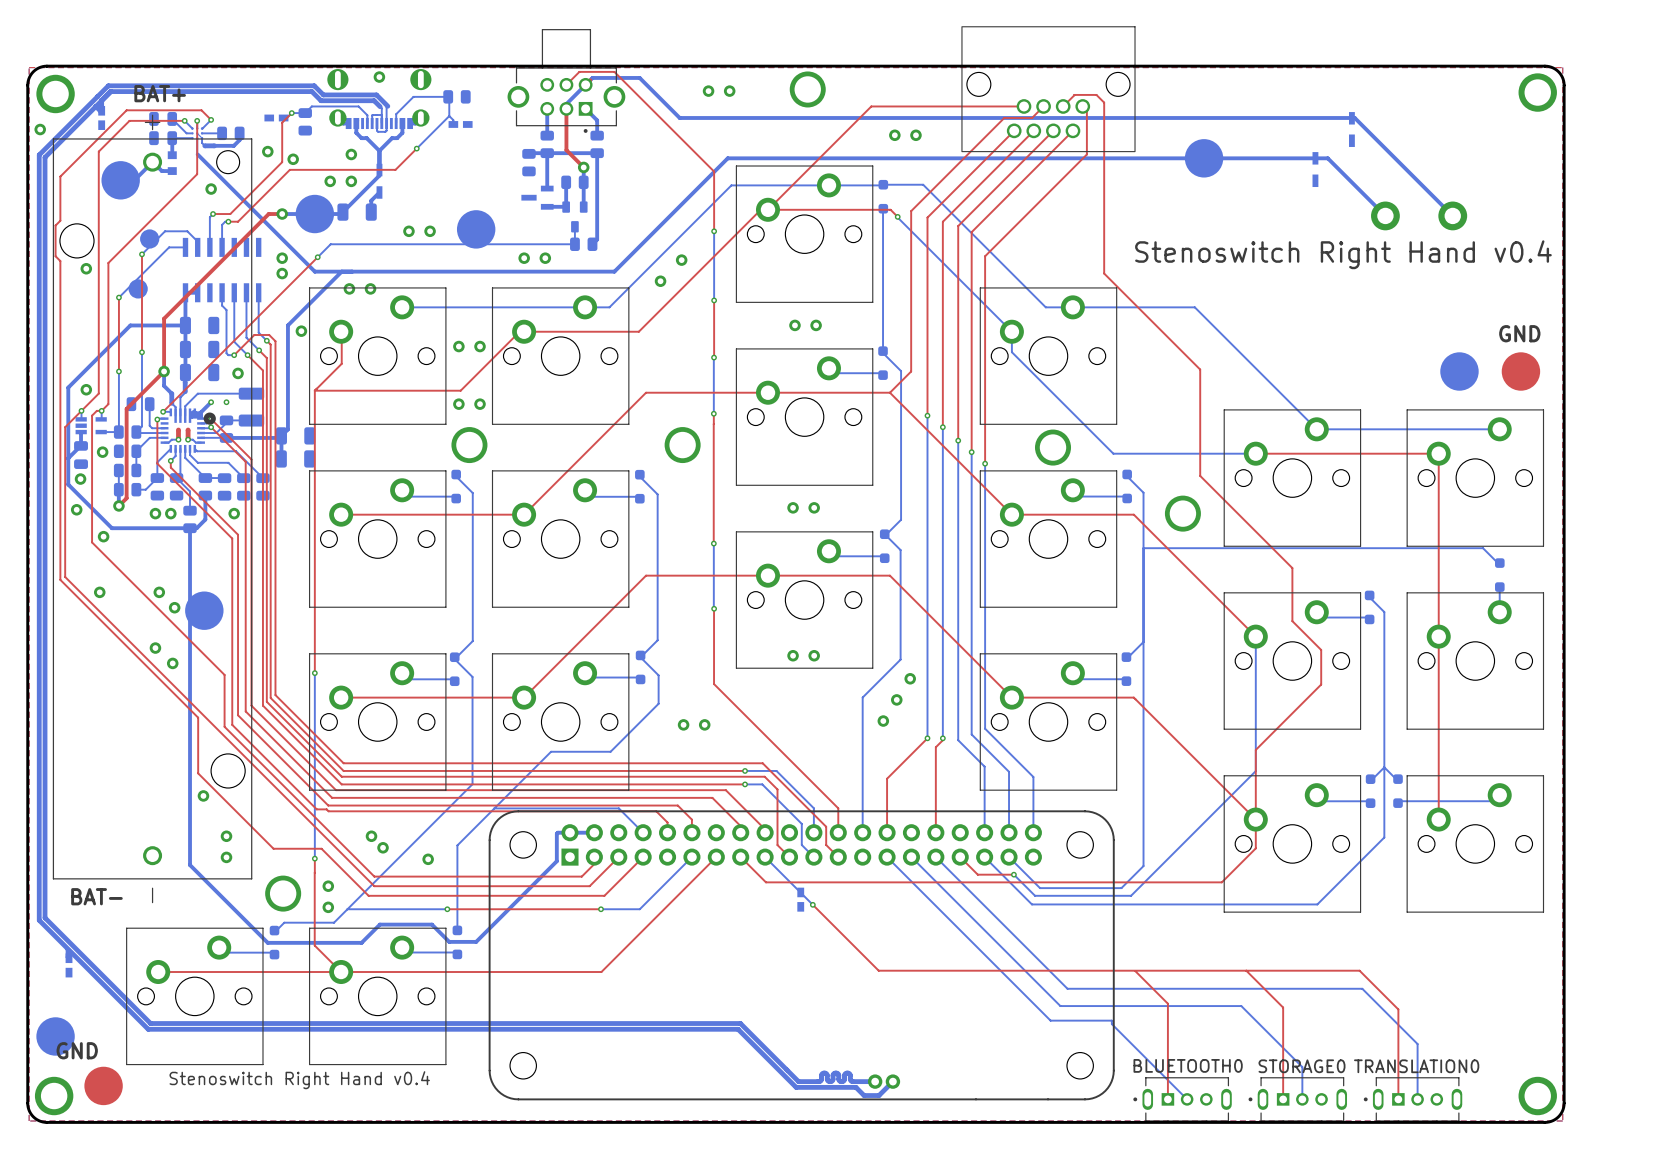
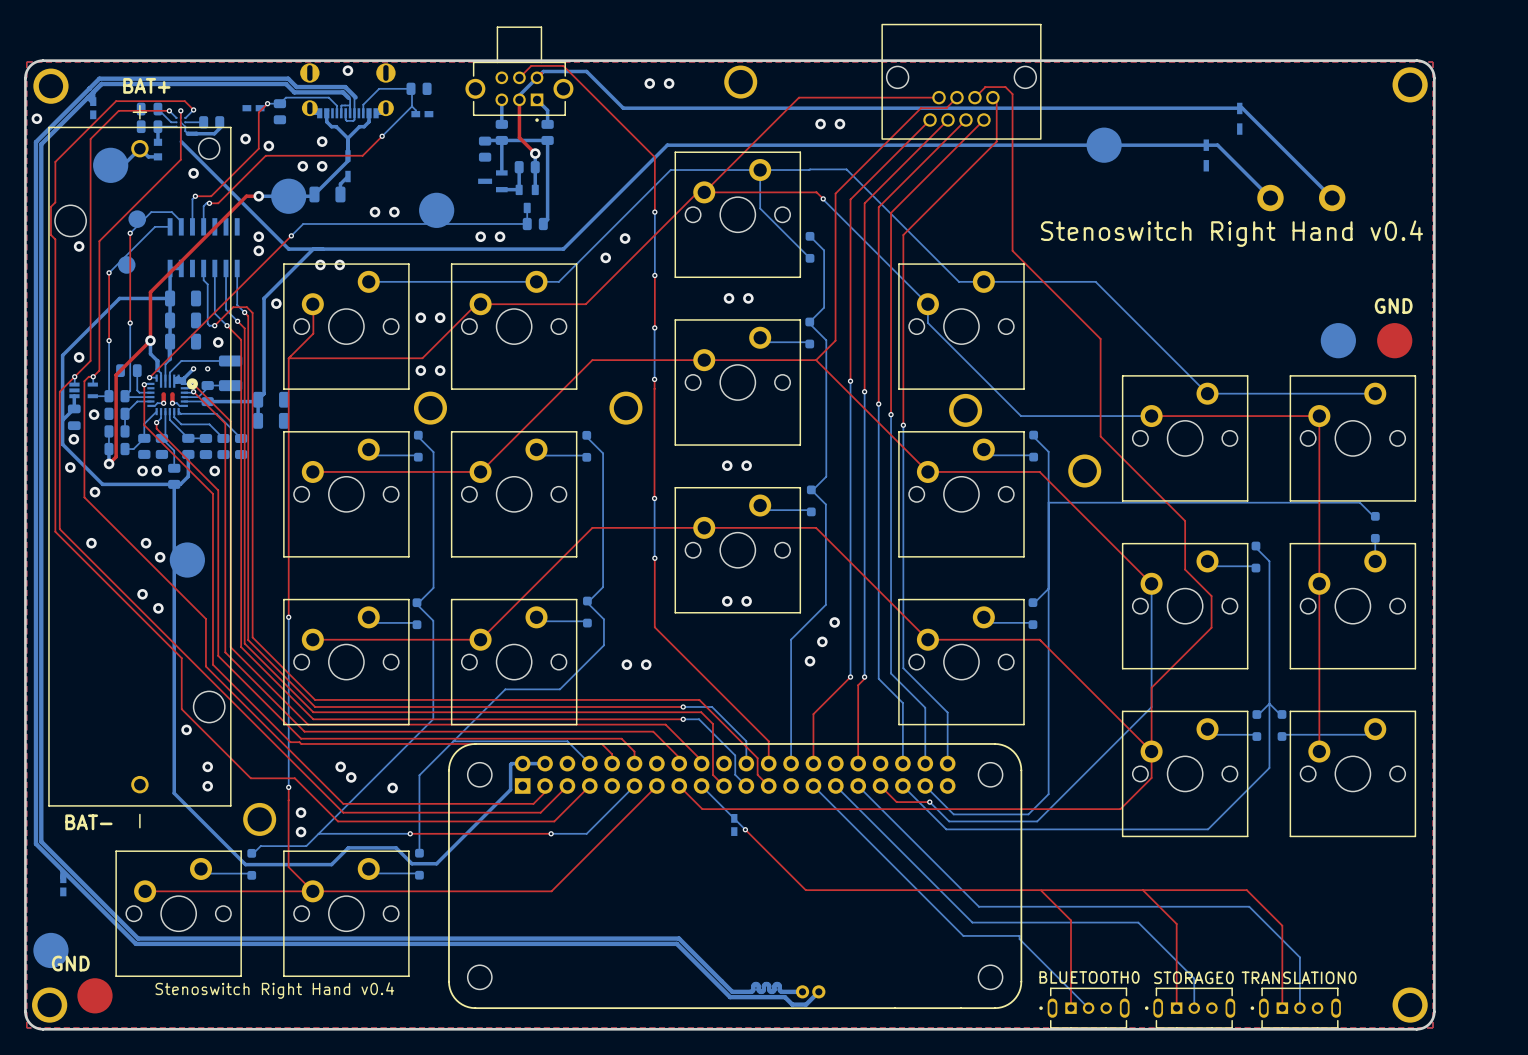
bottom track: none -> (760, 170) (760, 208) (810, 258)
part position: (883, 196) -> (810, 247)
bottom track: (883, 208) (883, 351) -> (810, 236) (824, 250) (824, 307) (809, 321)

